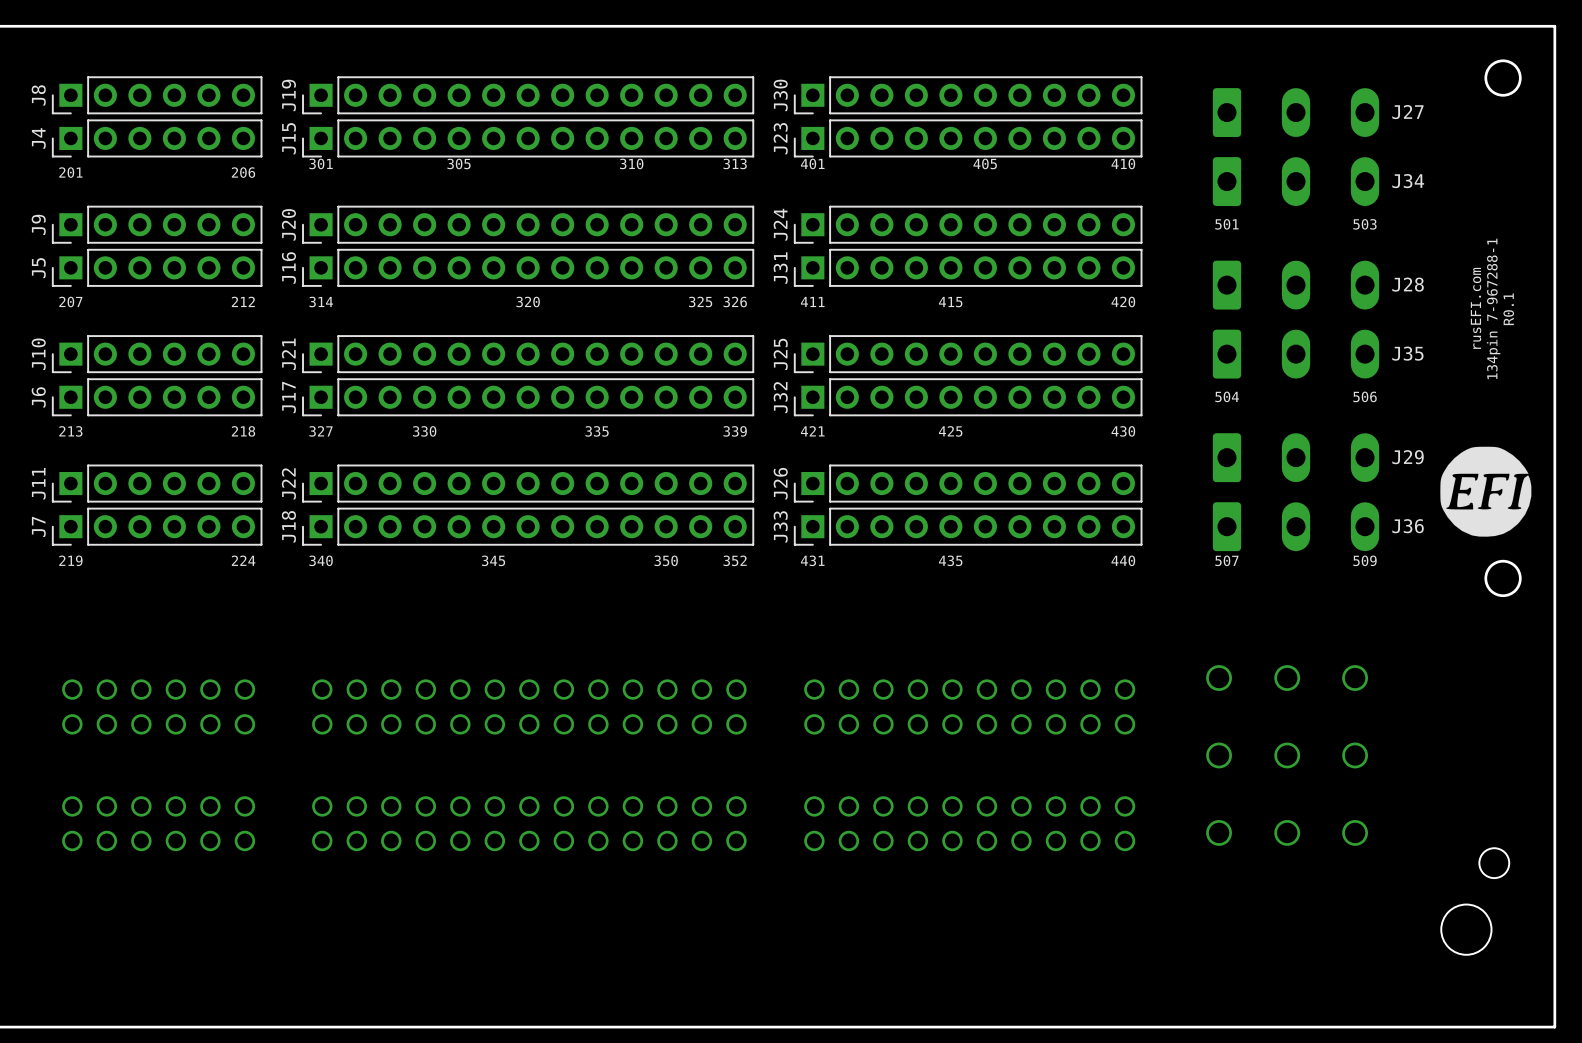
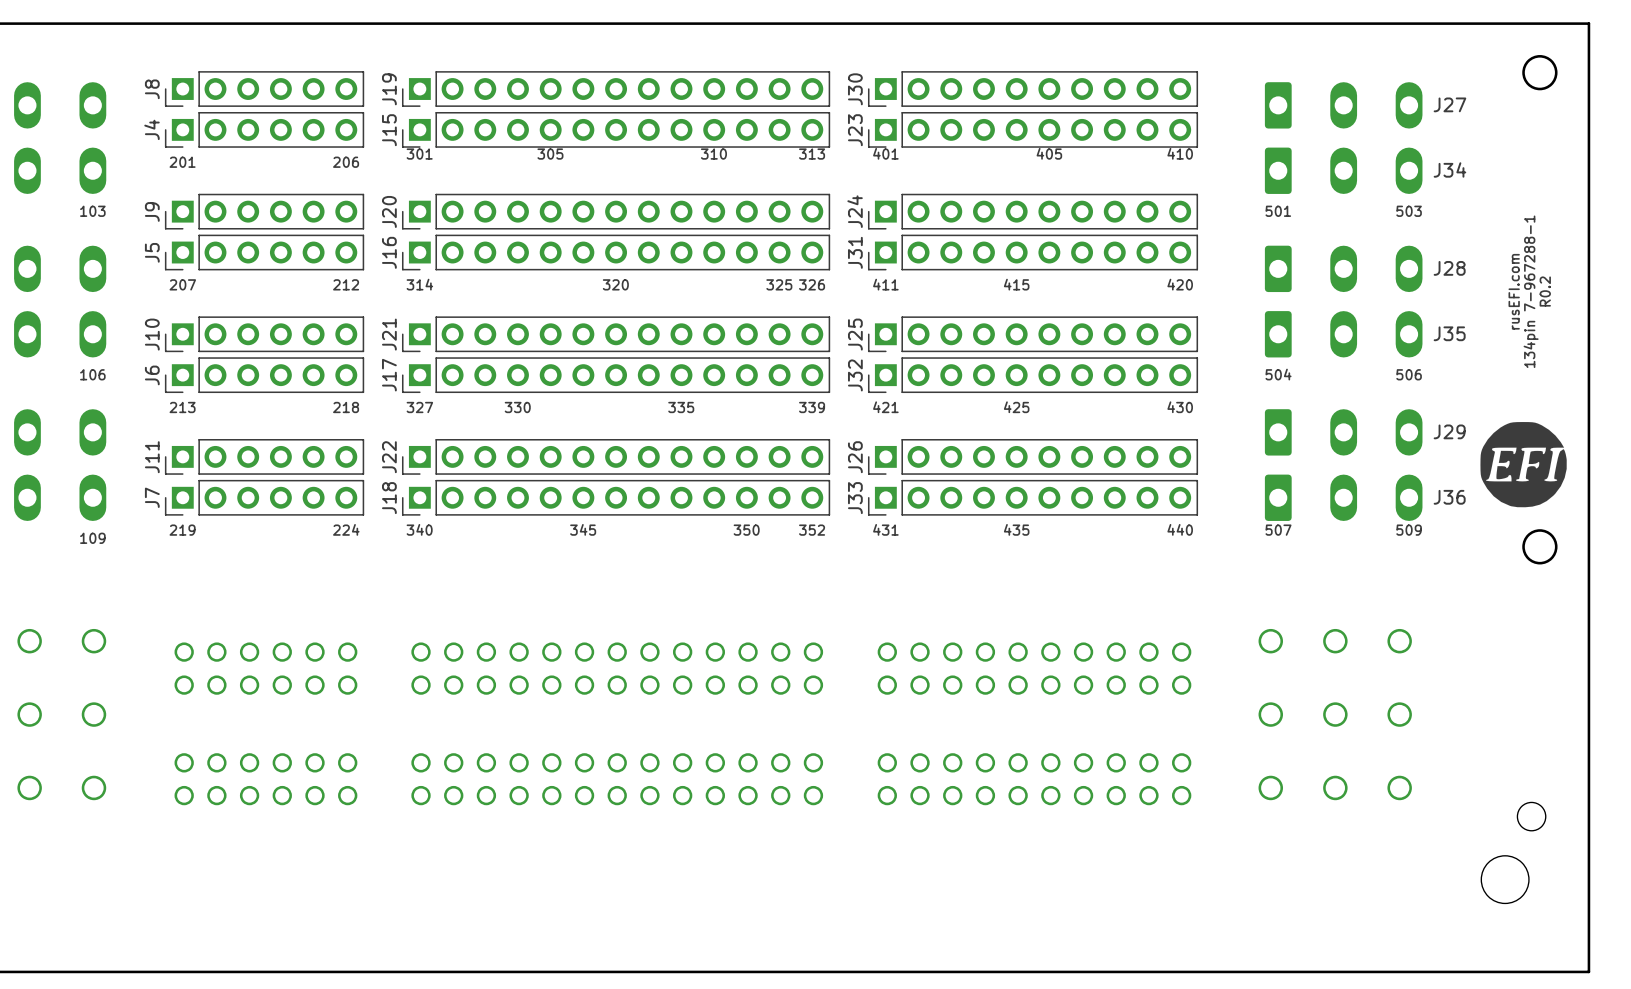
text: R0.1 (1508, 309) -> R0.2 (1545, 291)

